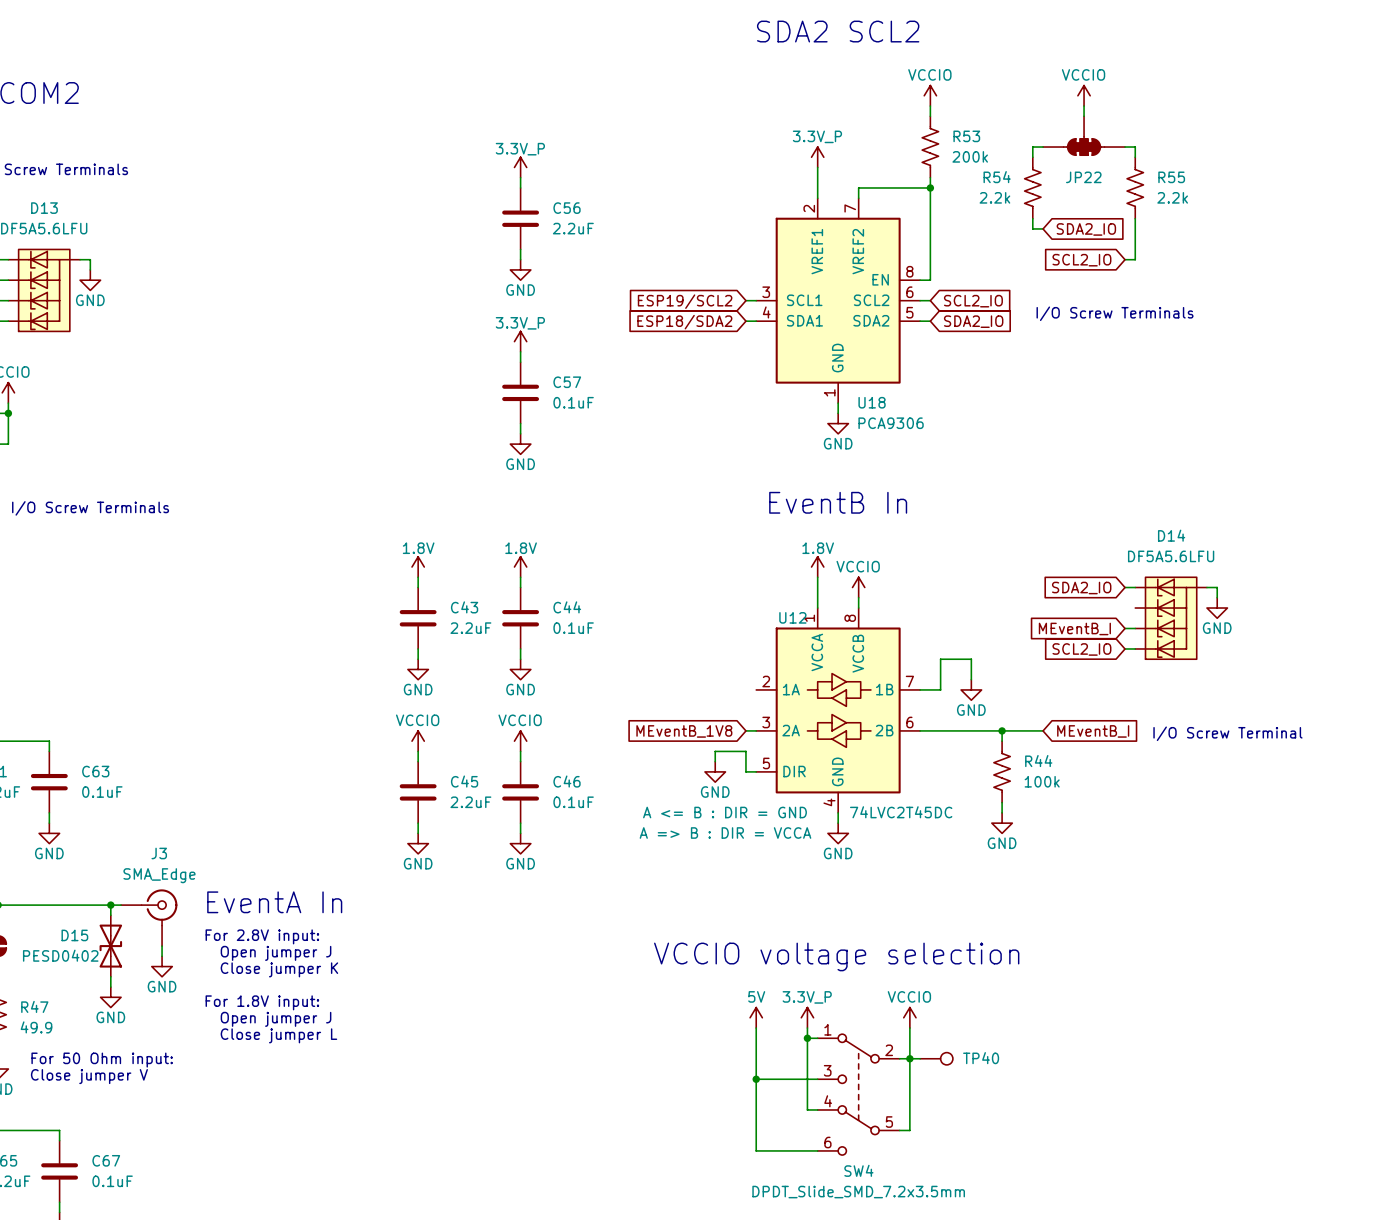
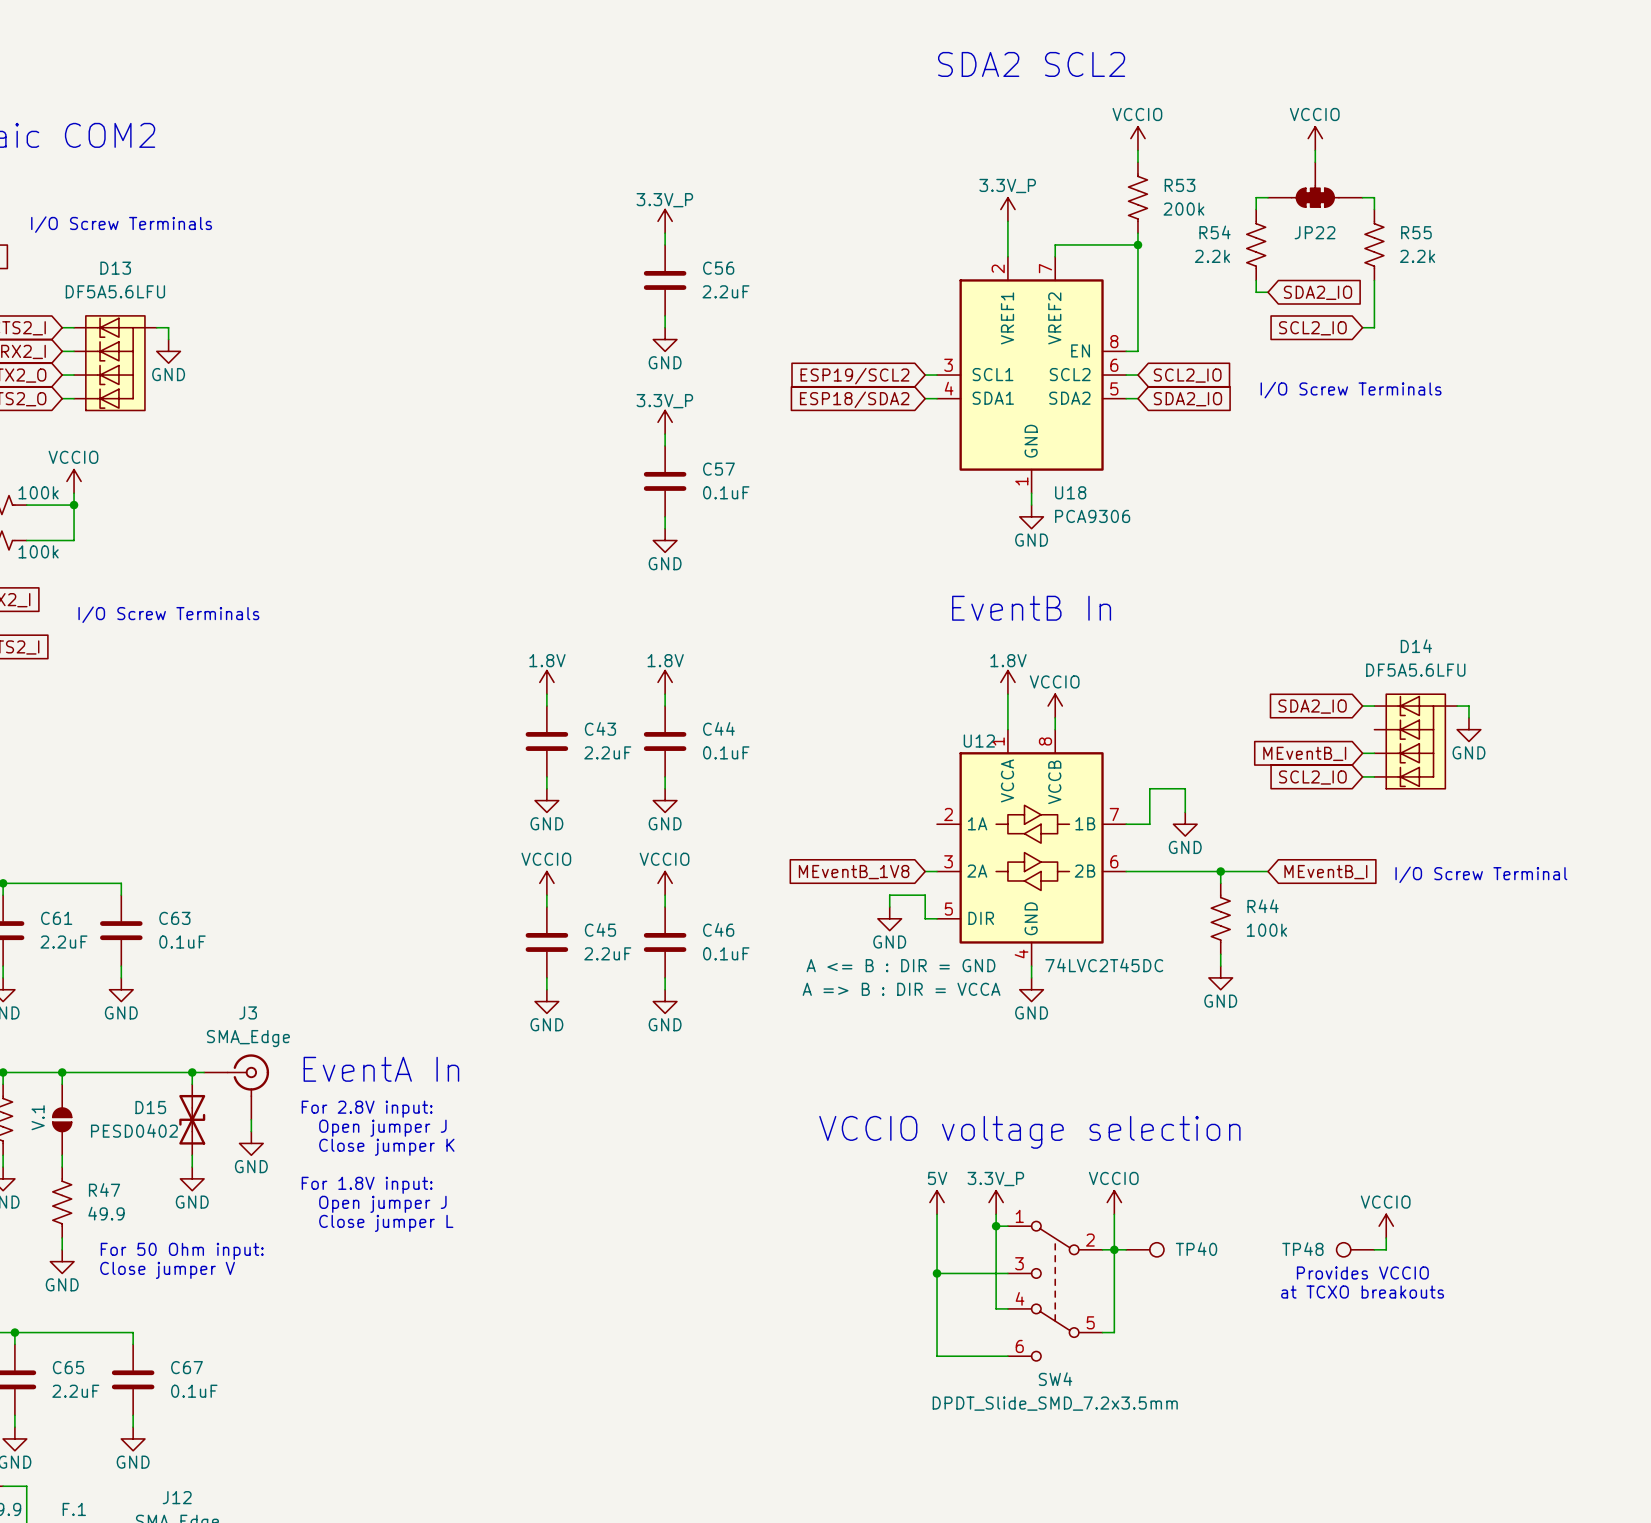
power symbol: none -> VCCIO (1386, 1226)
wire: none -> (1386, 1238) (1386, 1249) (1374, 1249)
TP48: none -> (1355, 1249)
text: none -> Provides VCCIO (1362, 1273)
text: none -> at TCXO breakouts (1362, 1292)

